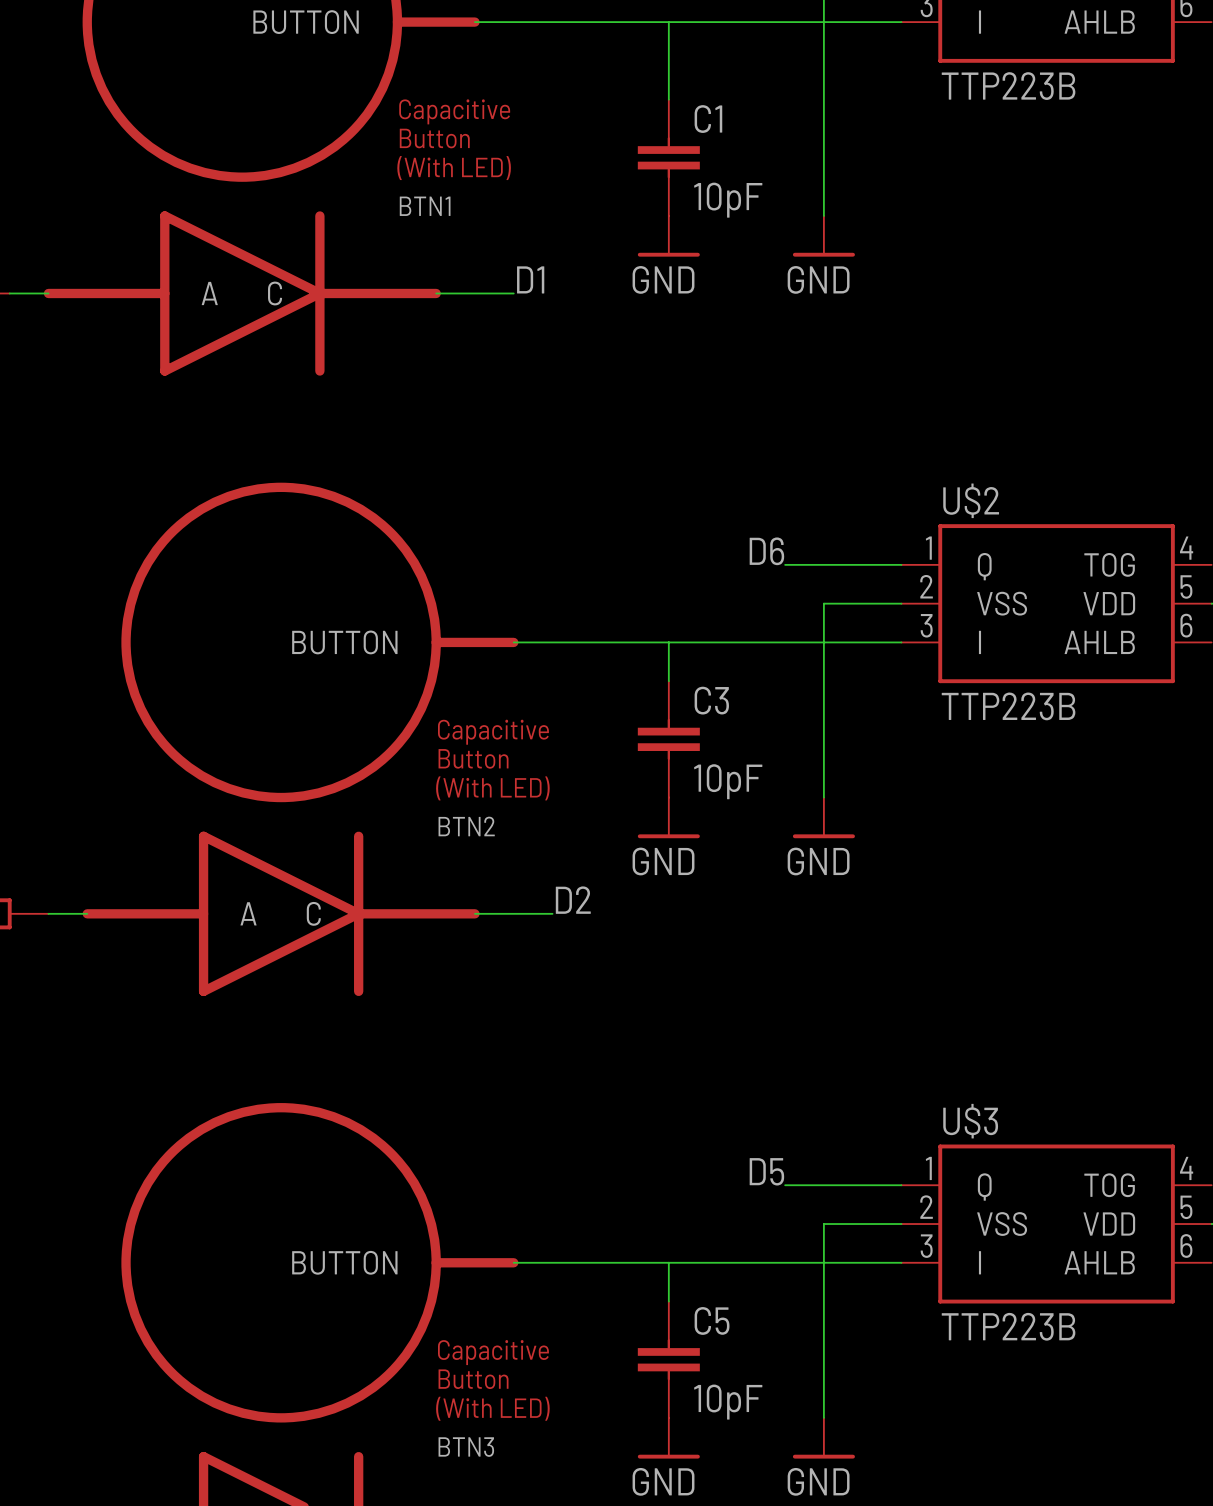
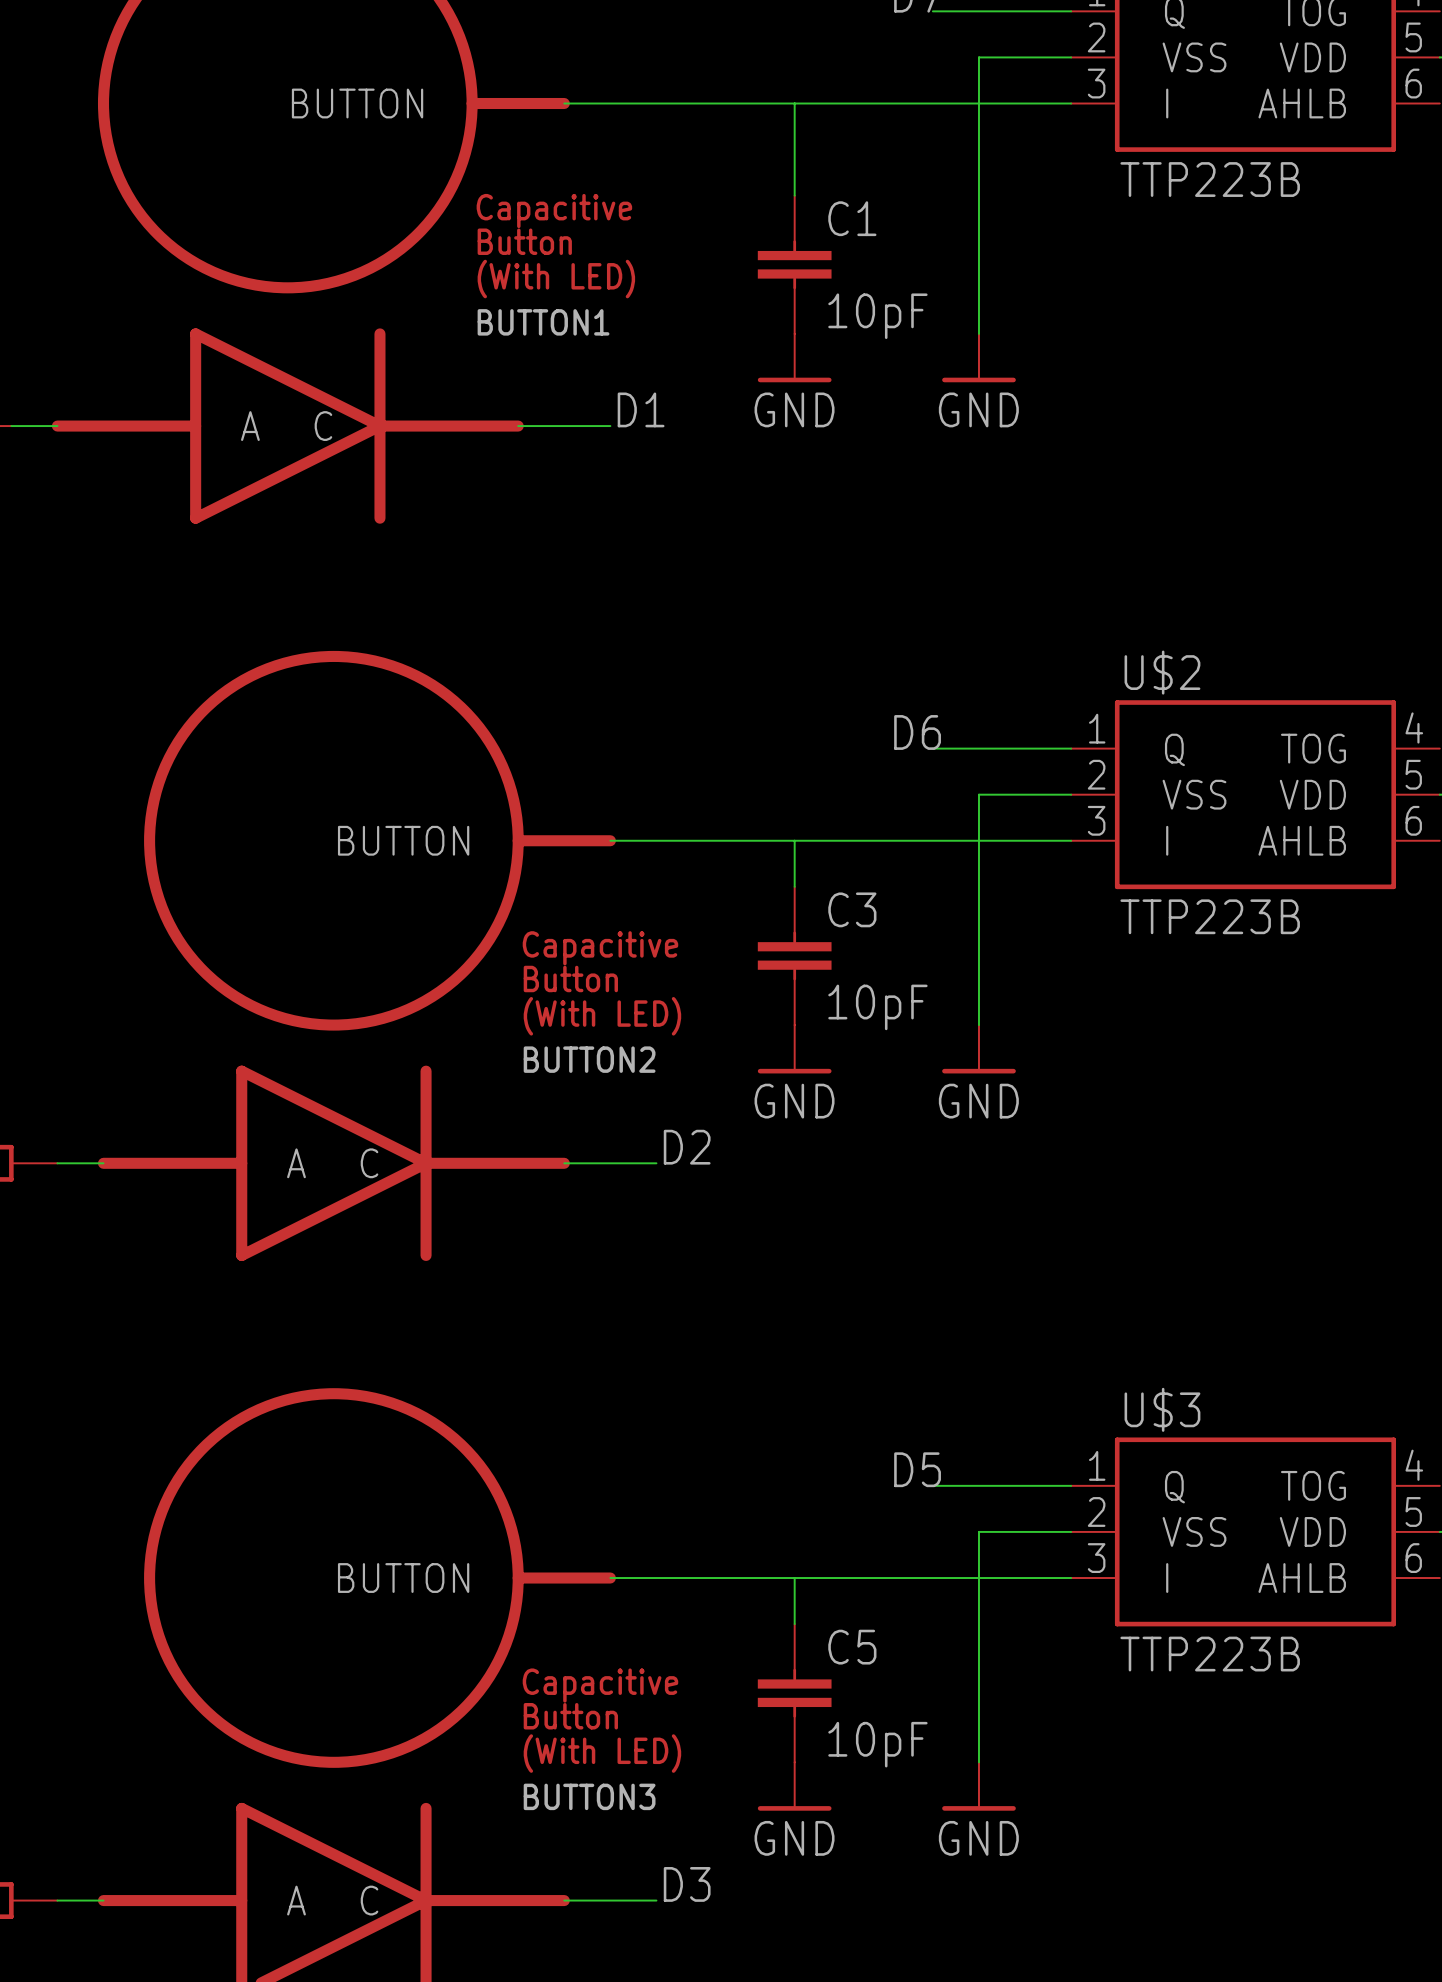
BTN1 name: BTN1 (425, 206) -> BUTTON1 (543, 322)
BTN2 name: BTN2 (466, 826) -> BUTTON2 (589, 1059)
BTN3 name: BTN3 (466, 1447) -> BUTTON3 (589, 1796)

